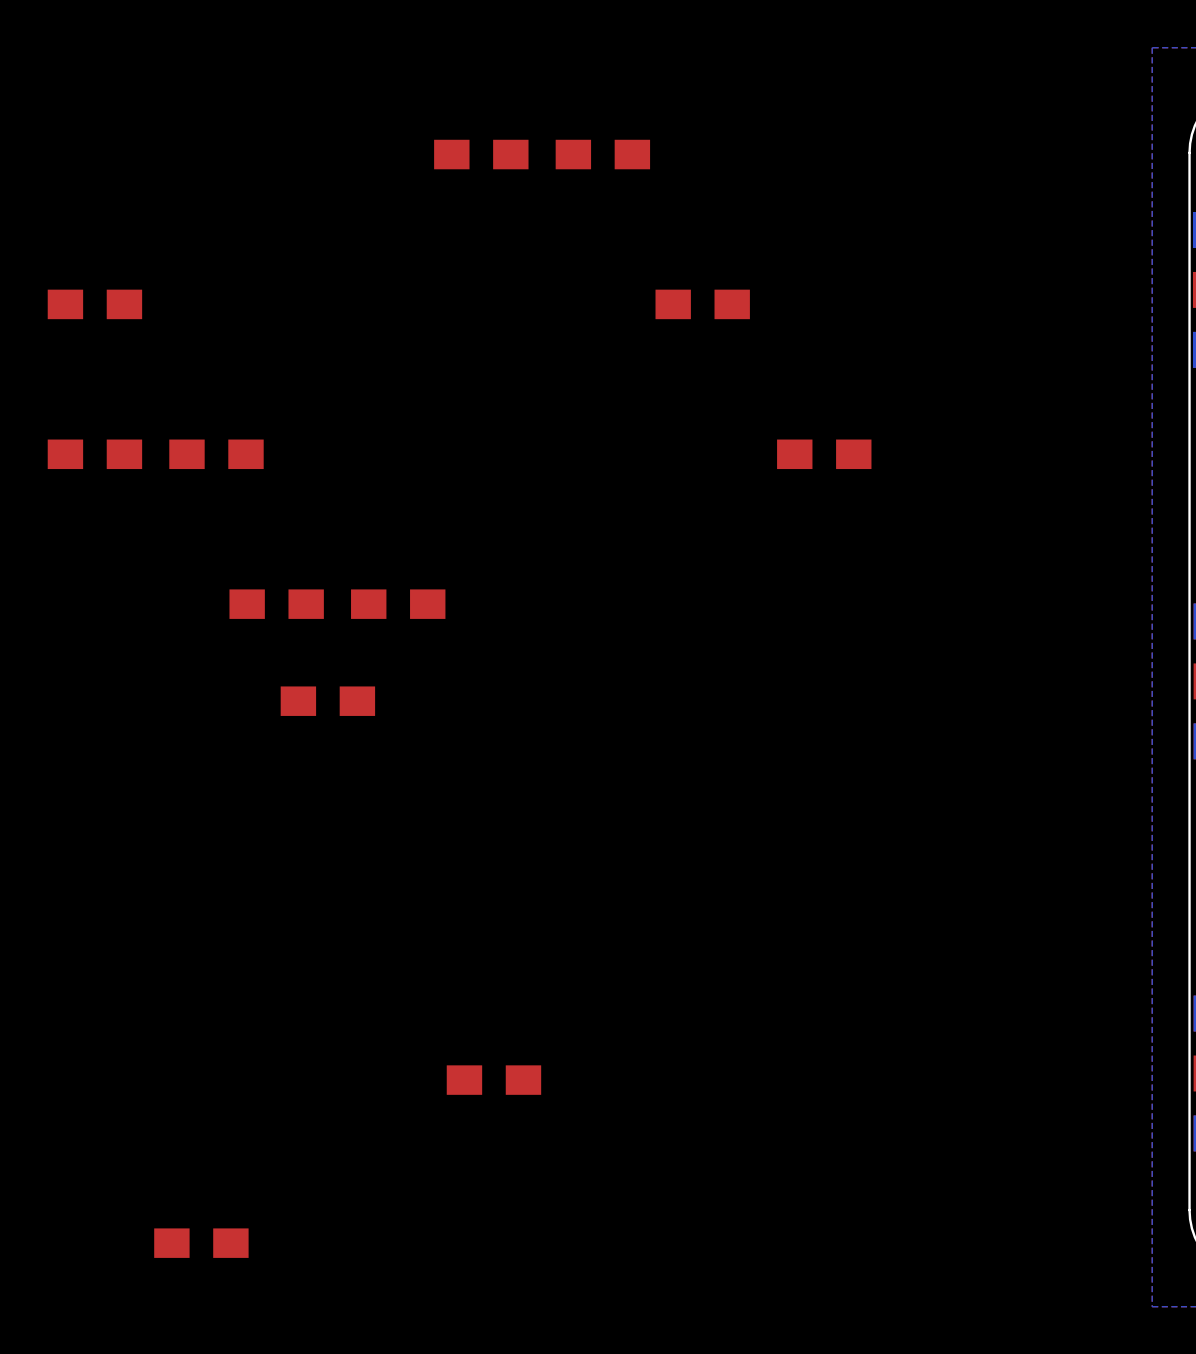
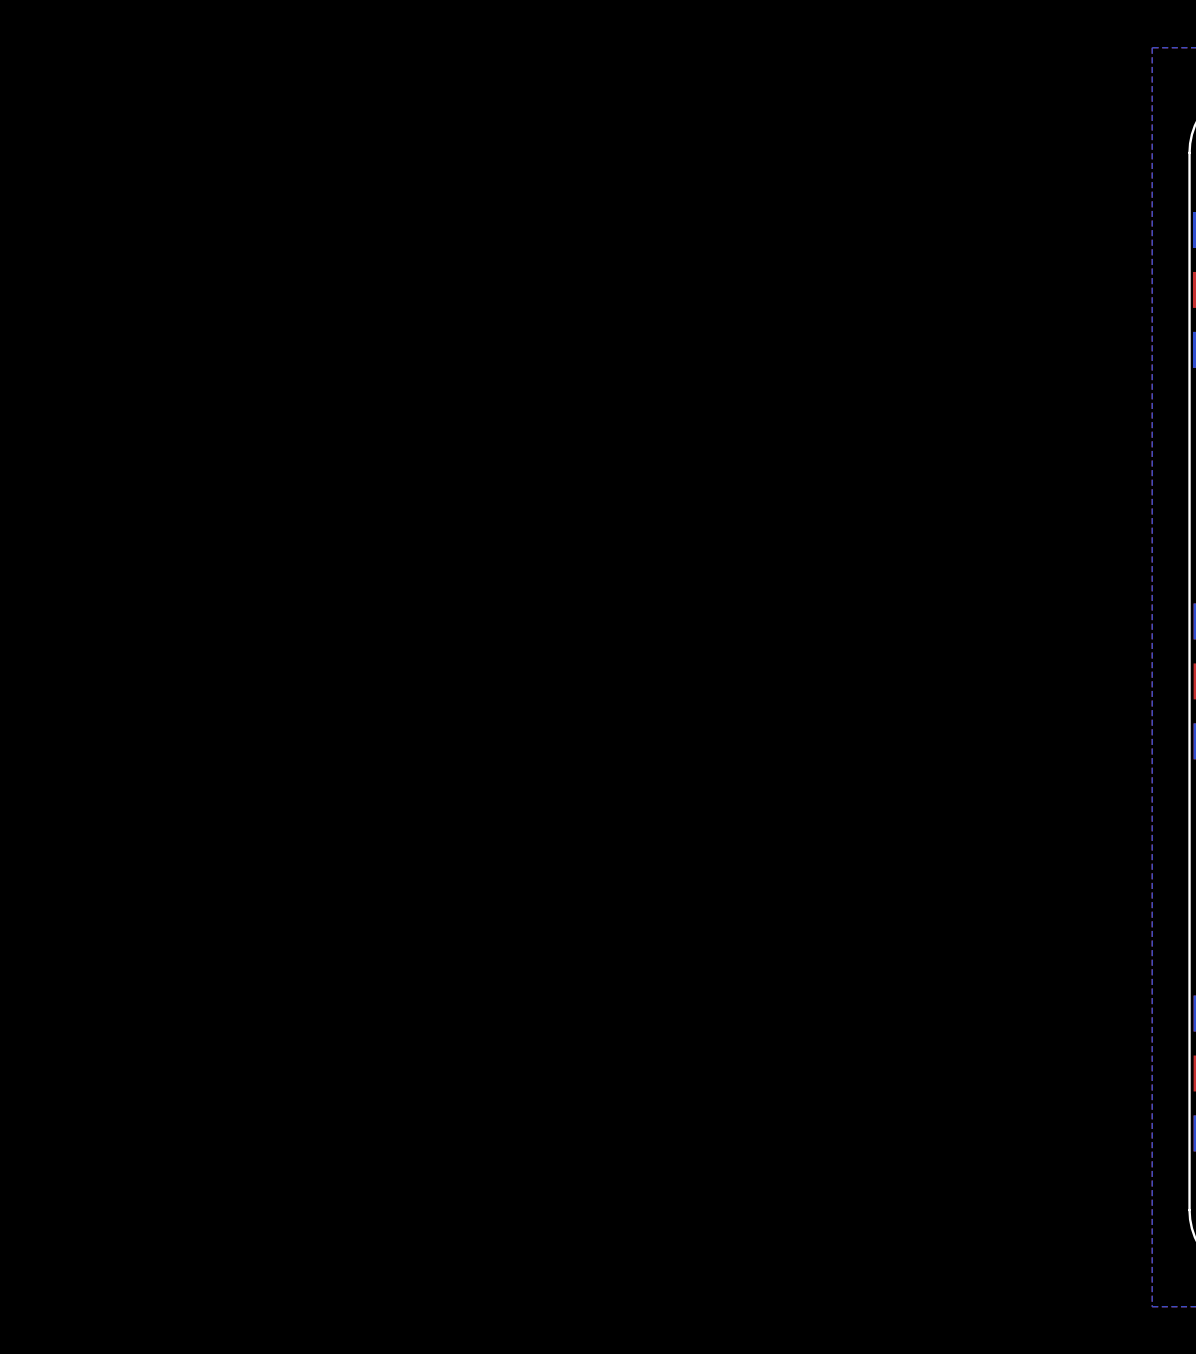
part: (481, 154) -> none
part: (602, 154) -> none
part: (94, 304) -> none
part: (702, 304) -> none
part: (94, 454) -> none
part: (216, 454) -> none
part: (824, 454) -> none
part: (276, 604) -> none
part: (398, 604) -> none
part: (327, 701) -> none
part: (493, 1080) -> none
part: (201, 1243) -> none

